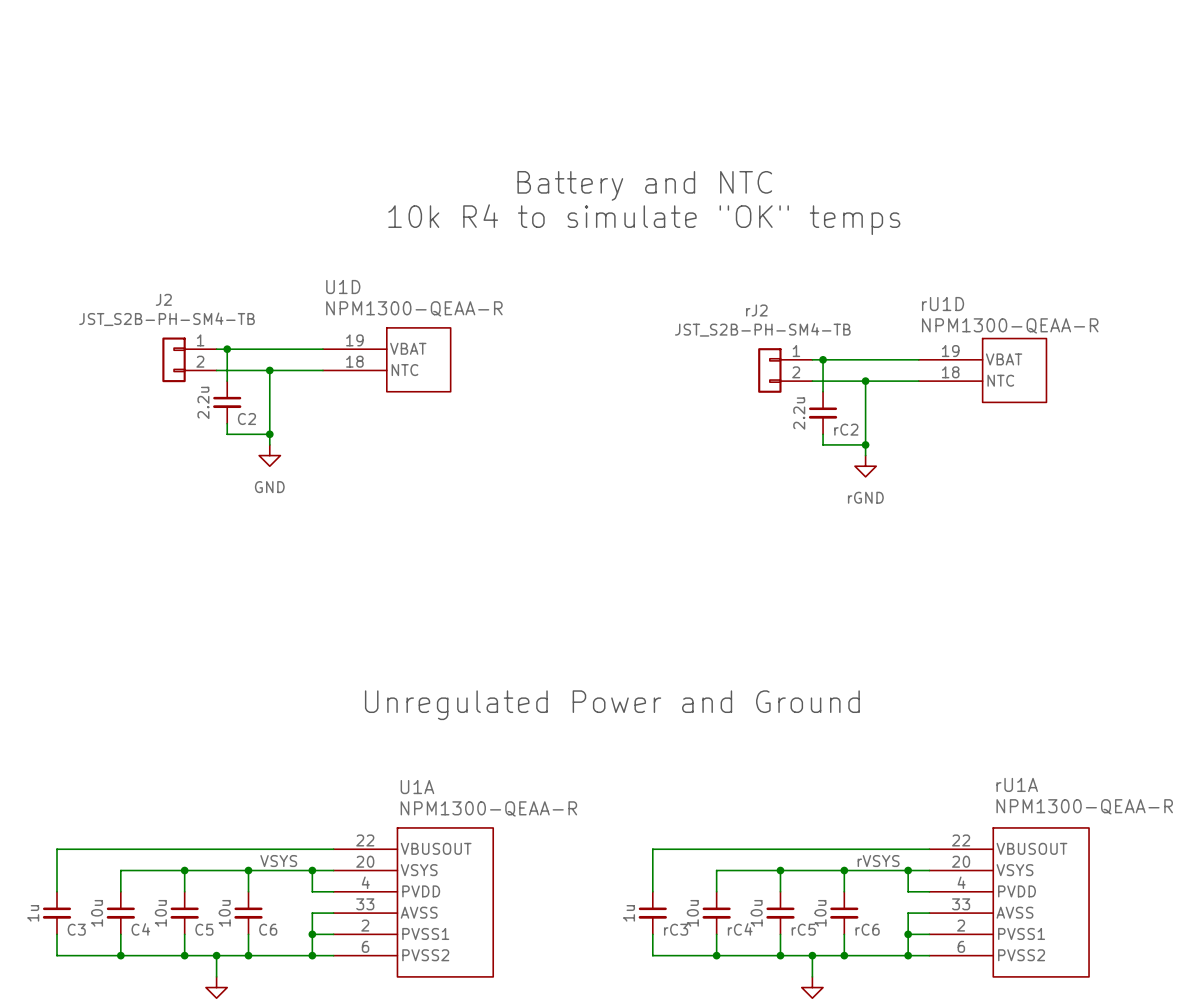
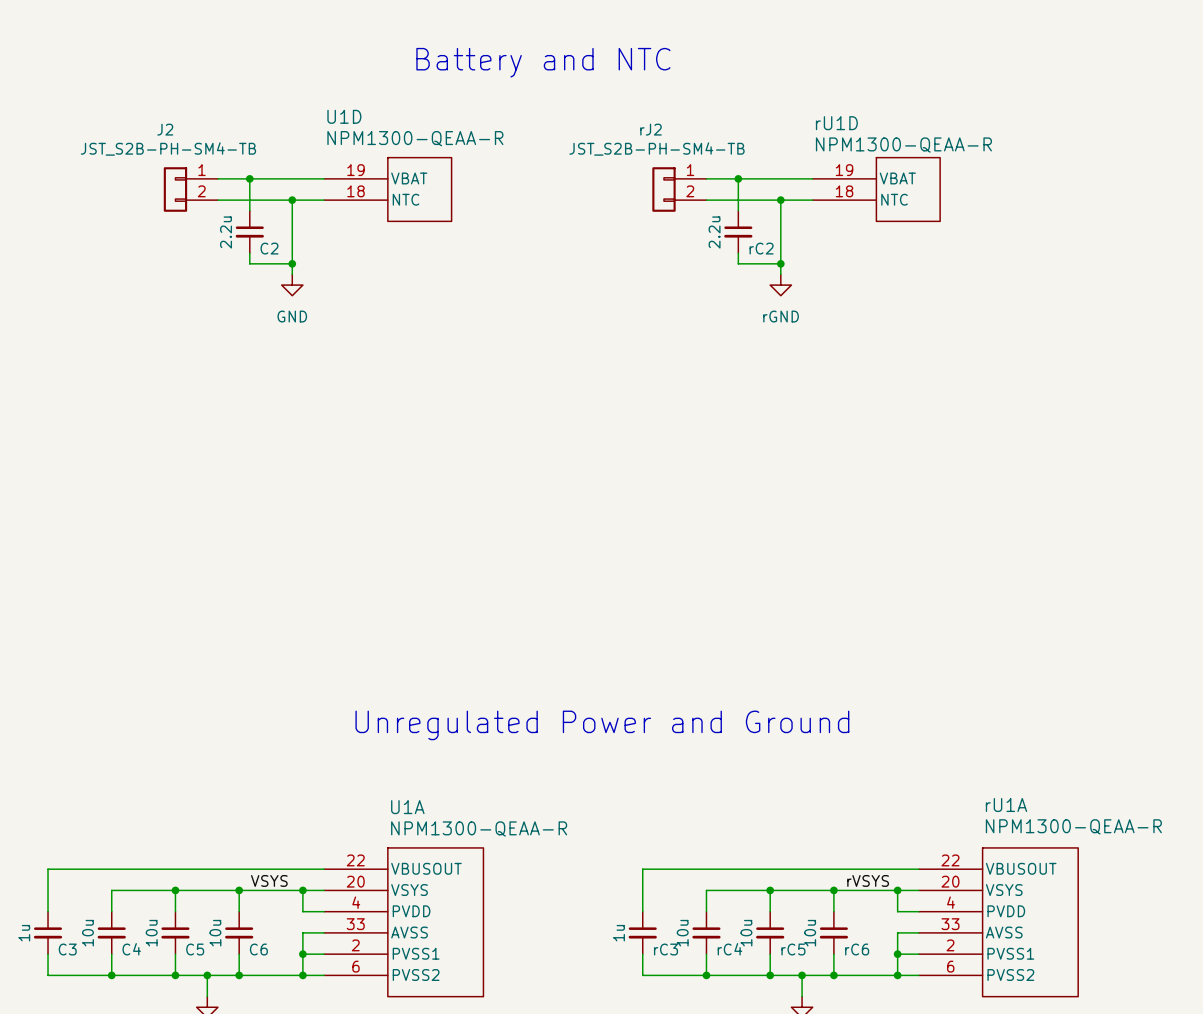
junction: none -> (249, 178)
wire: none -> (706, 178) (812, 178)
wire: none -> (738, 178) (738, 210)
junction: none -> (738, 178)
junction: none -> (292, 200)
wire: none -> (780, 200) (780, 274)
junction: none -> (780, 200)
text position: Battery and NTC (644, 185) -> Battery and NTC (543, 62)
text: 10k R4 to simulate "OK" temps (644, 219) -> none
wire: none -> (738, 253) (738, 263) (780, 263)
junction: none -> (292, 263)
junction: none -> (780, 263)
power symbol: none -> rGND (780, 285)
wire: (216, 349) (322, 349) -> (217, 178) (324, 178)
wire: (227, 349) (227, 381) -> (249, 178) (249, 210)
junction: (227, 349) -> none
J2 position: (189, 359) -> (190, 189)
U1D position: (386, 359) -> (387, 189)
wire: (812, 359) (918, 359) -> (706, 200) (812, 200)
wire: (823, 359) (823, 391) -> none
junction: (823, 359) -> none
wire: (216, 370) (322, 370) -> (217, 200) (324, 200)
wire: (269, 370) (269, 444) -> (292, 200) (292, 274)
junction: (269, 370) -> none
rJ2 position: (785, 370) -> (679, 189)
rU1D position: (982, 370) -> (876, 189)
wire: (812, 381) (918, 381) -> none
wire: (865, 381) (865, 455) -> none
junction: (865, 381) -> none
C2 position: (227, 402) -> (249, 231)
rC2 position: (823, 413) -> (738, 231)
wire: (227, 423) (227, 434) (269, 434) -> (249, 253) (249, 263) (292, 263)
junction: (269, 434) -> none
wire: (823, 434) (823, 444) (865, 444) -> none
junction: (865, 444) -> none
power symbol position: GND (269, 455) -> GND (292, 285)
power symbol: rGND (865, 466) -> none

